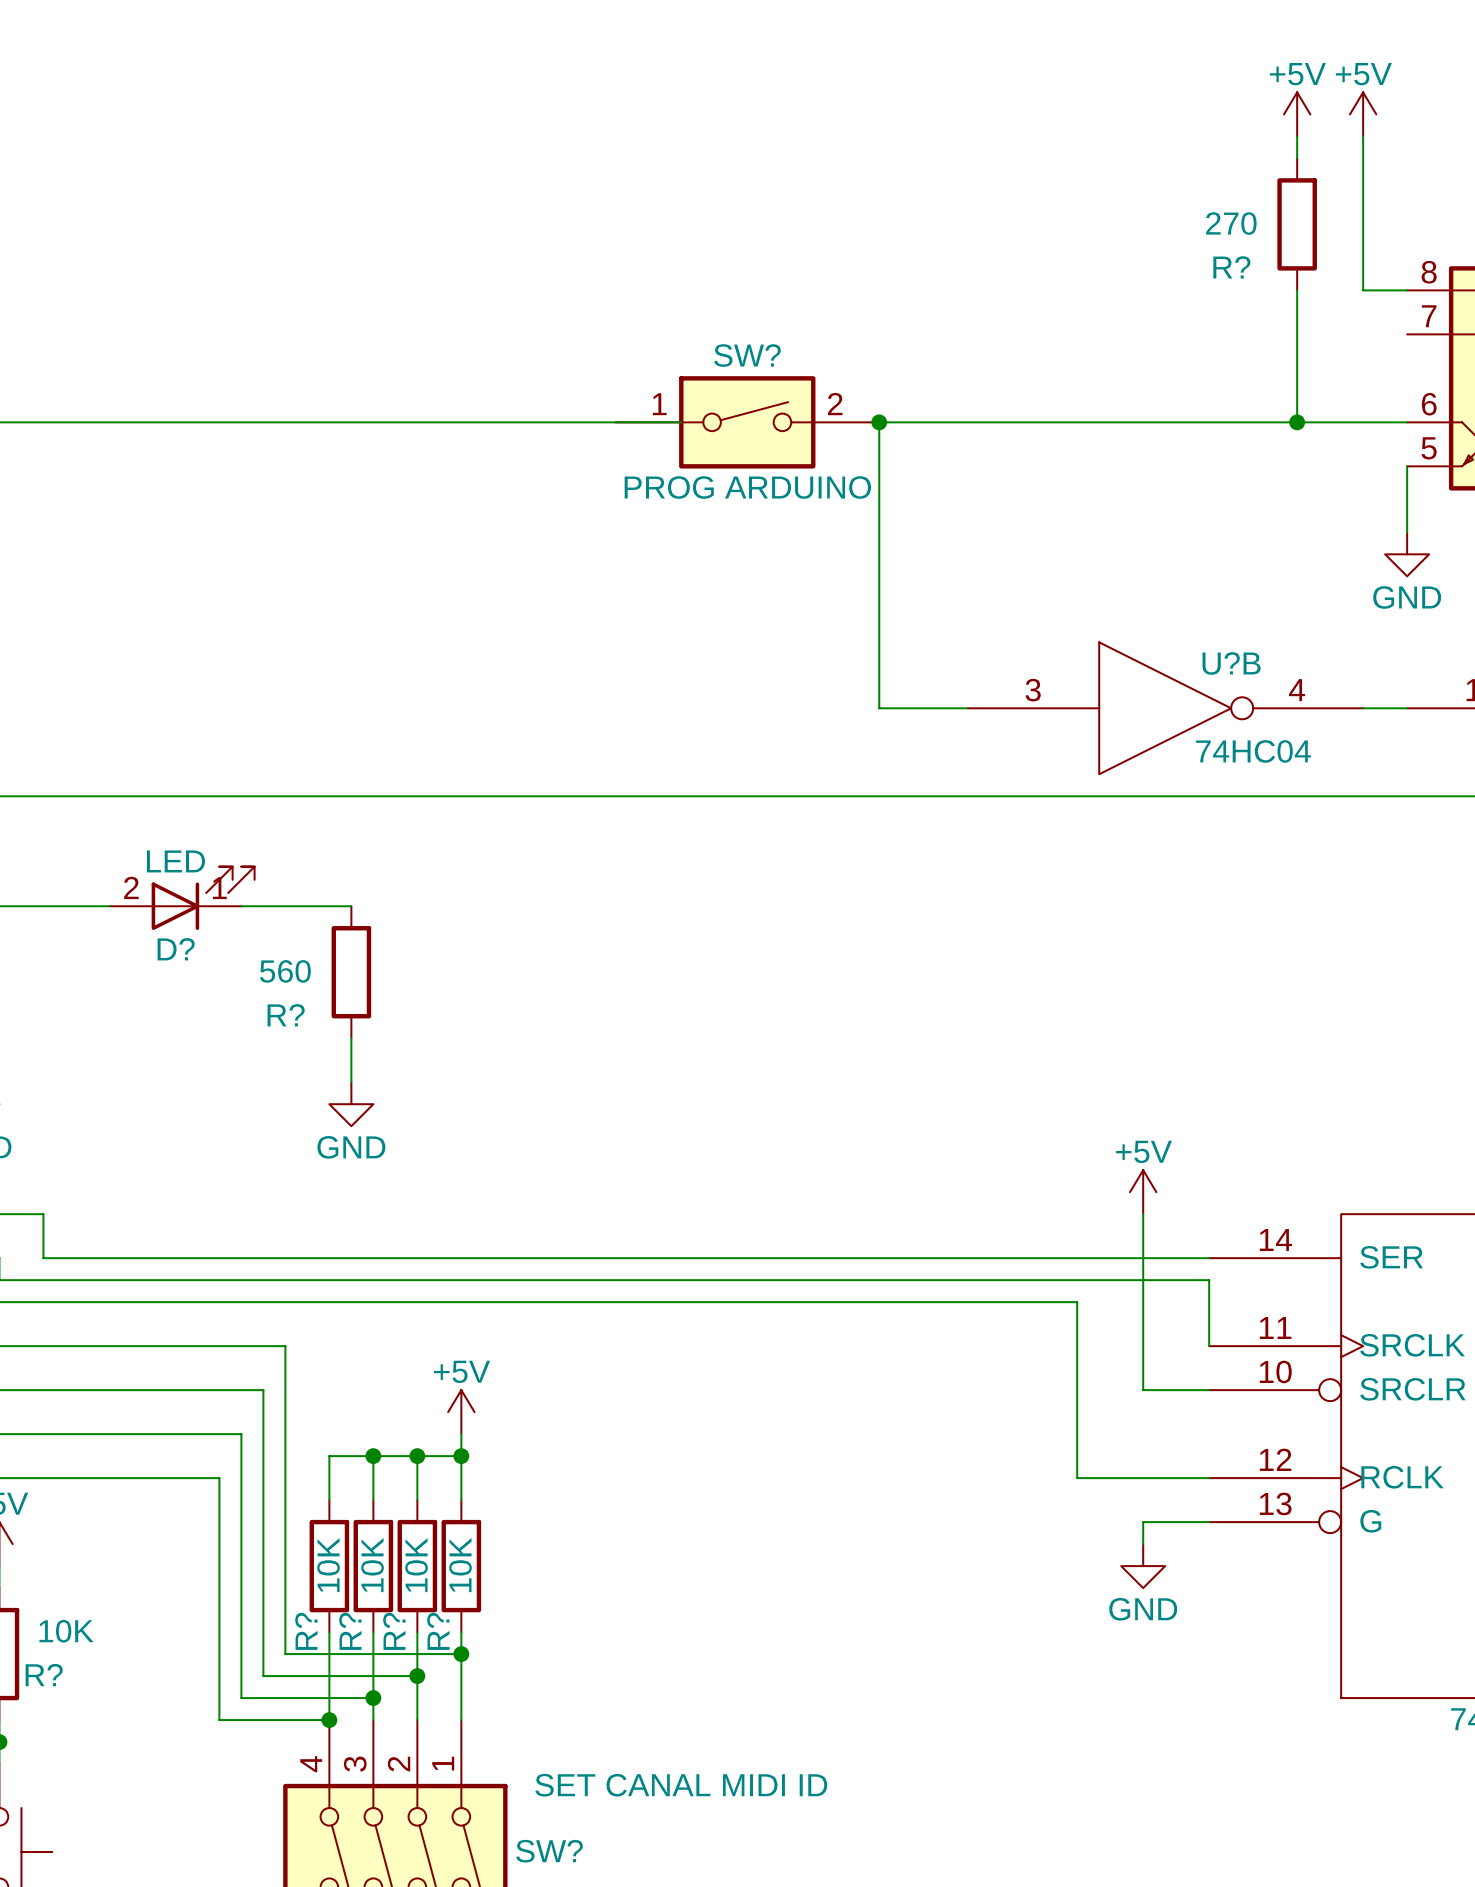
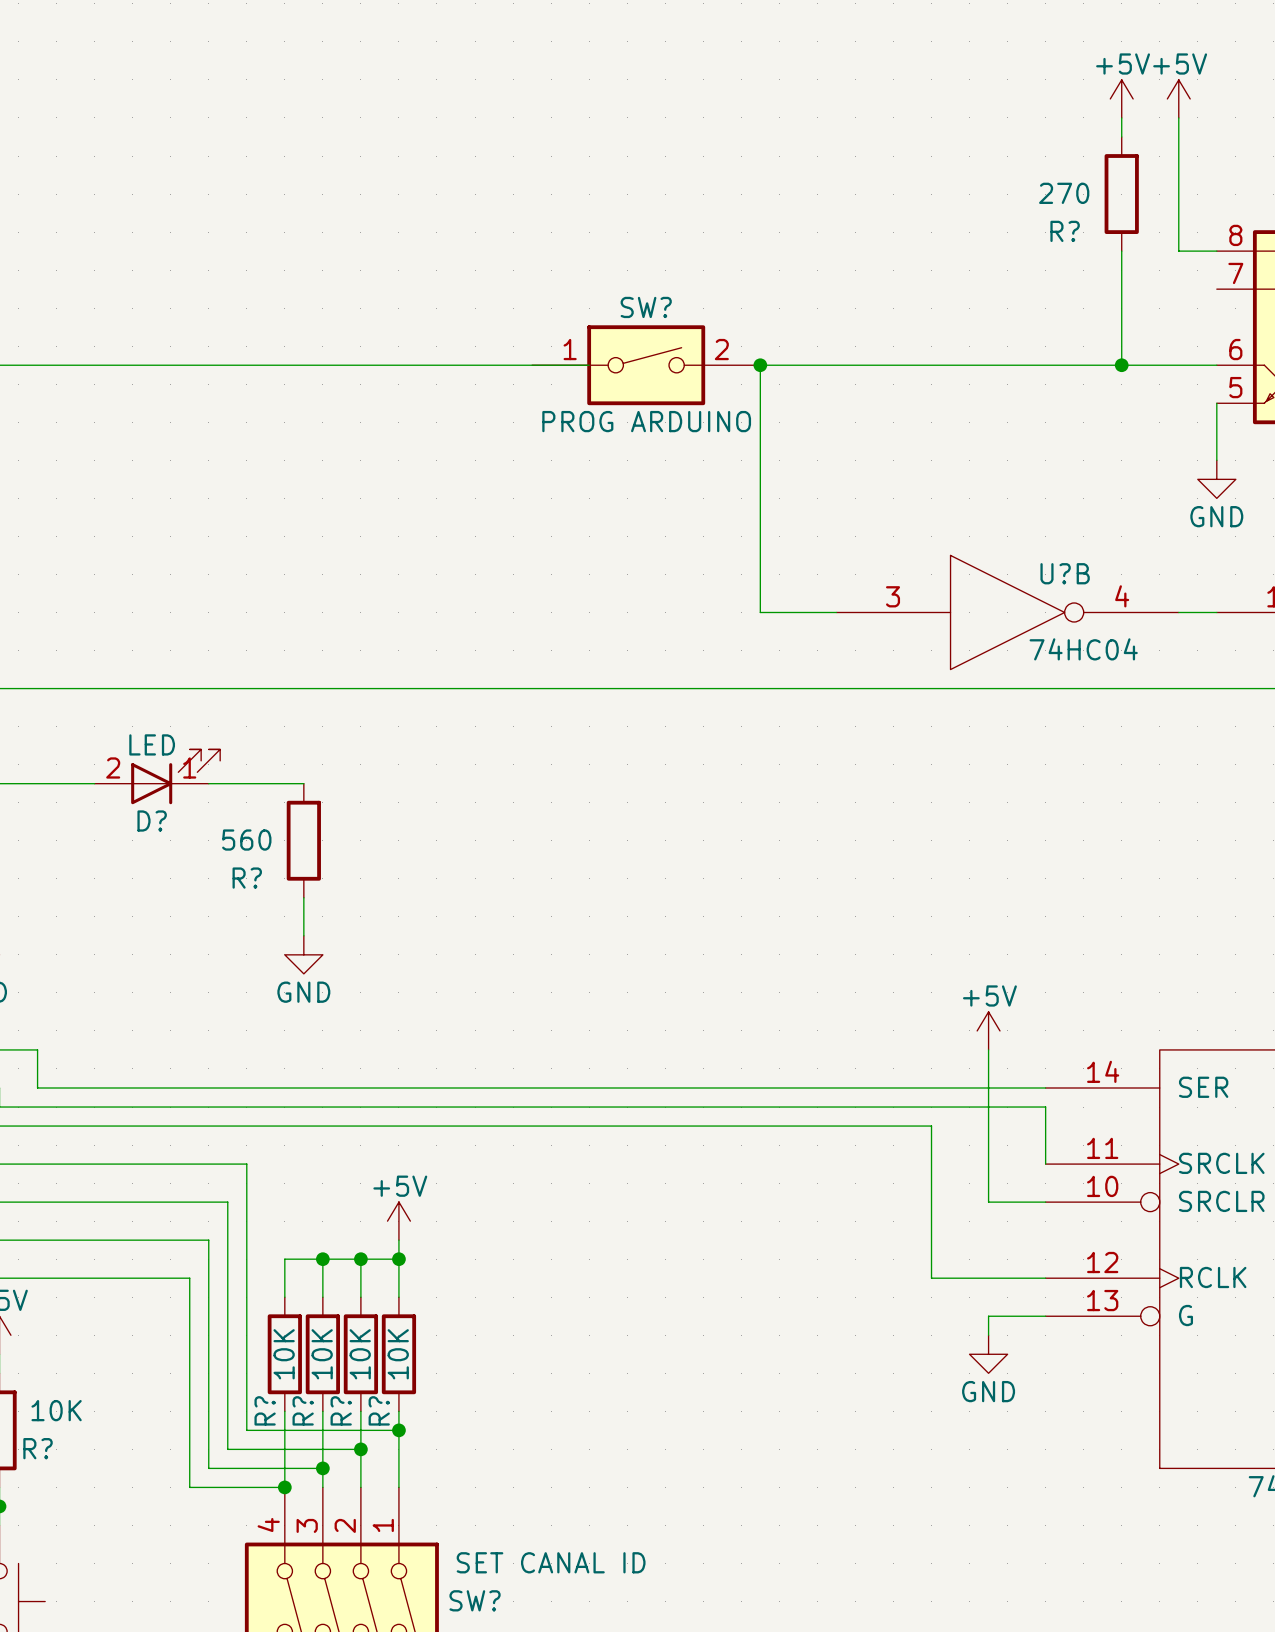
SW? value: SET CANAL MIDI ID (681, 1785) -> SET CANAL ID (551, 1562)

